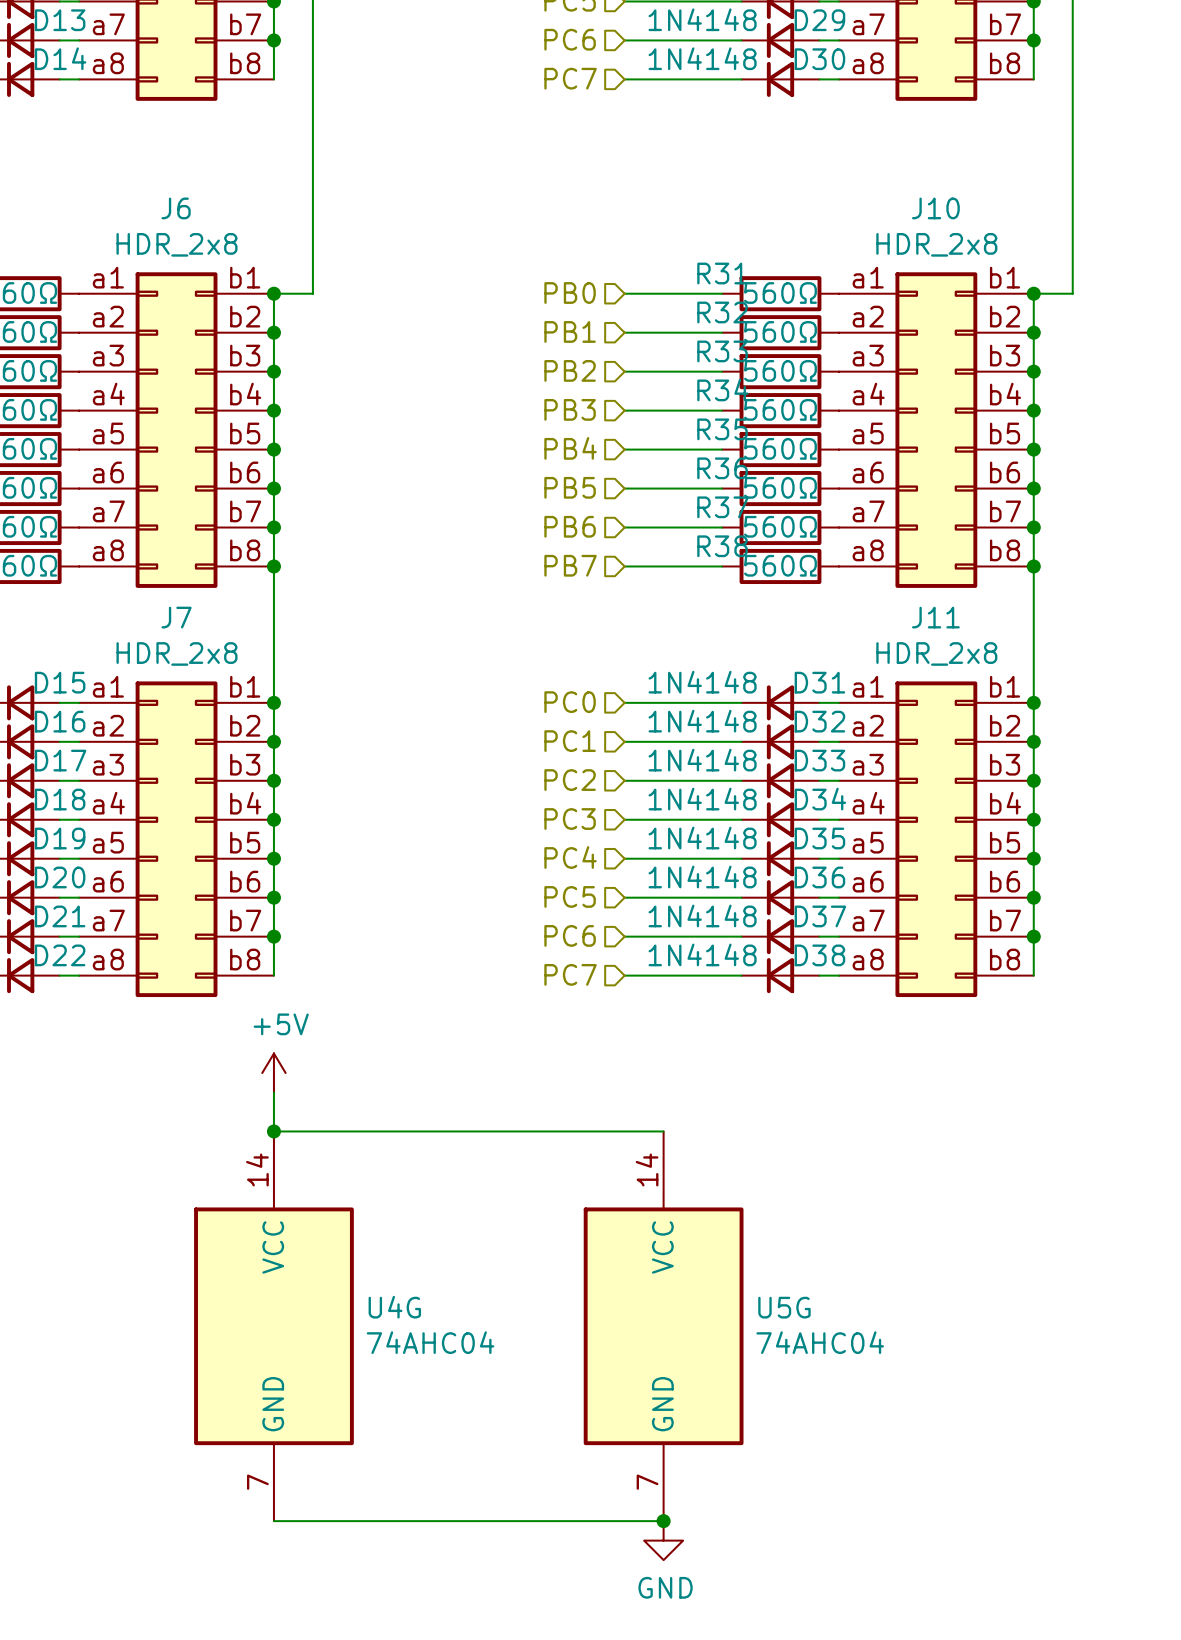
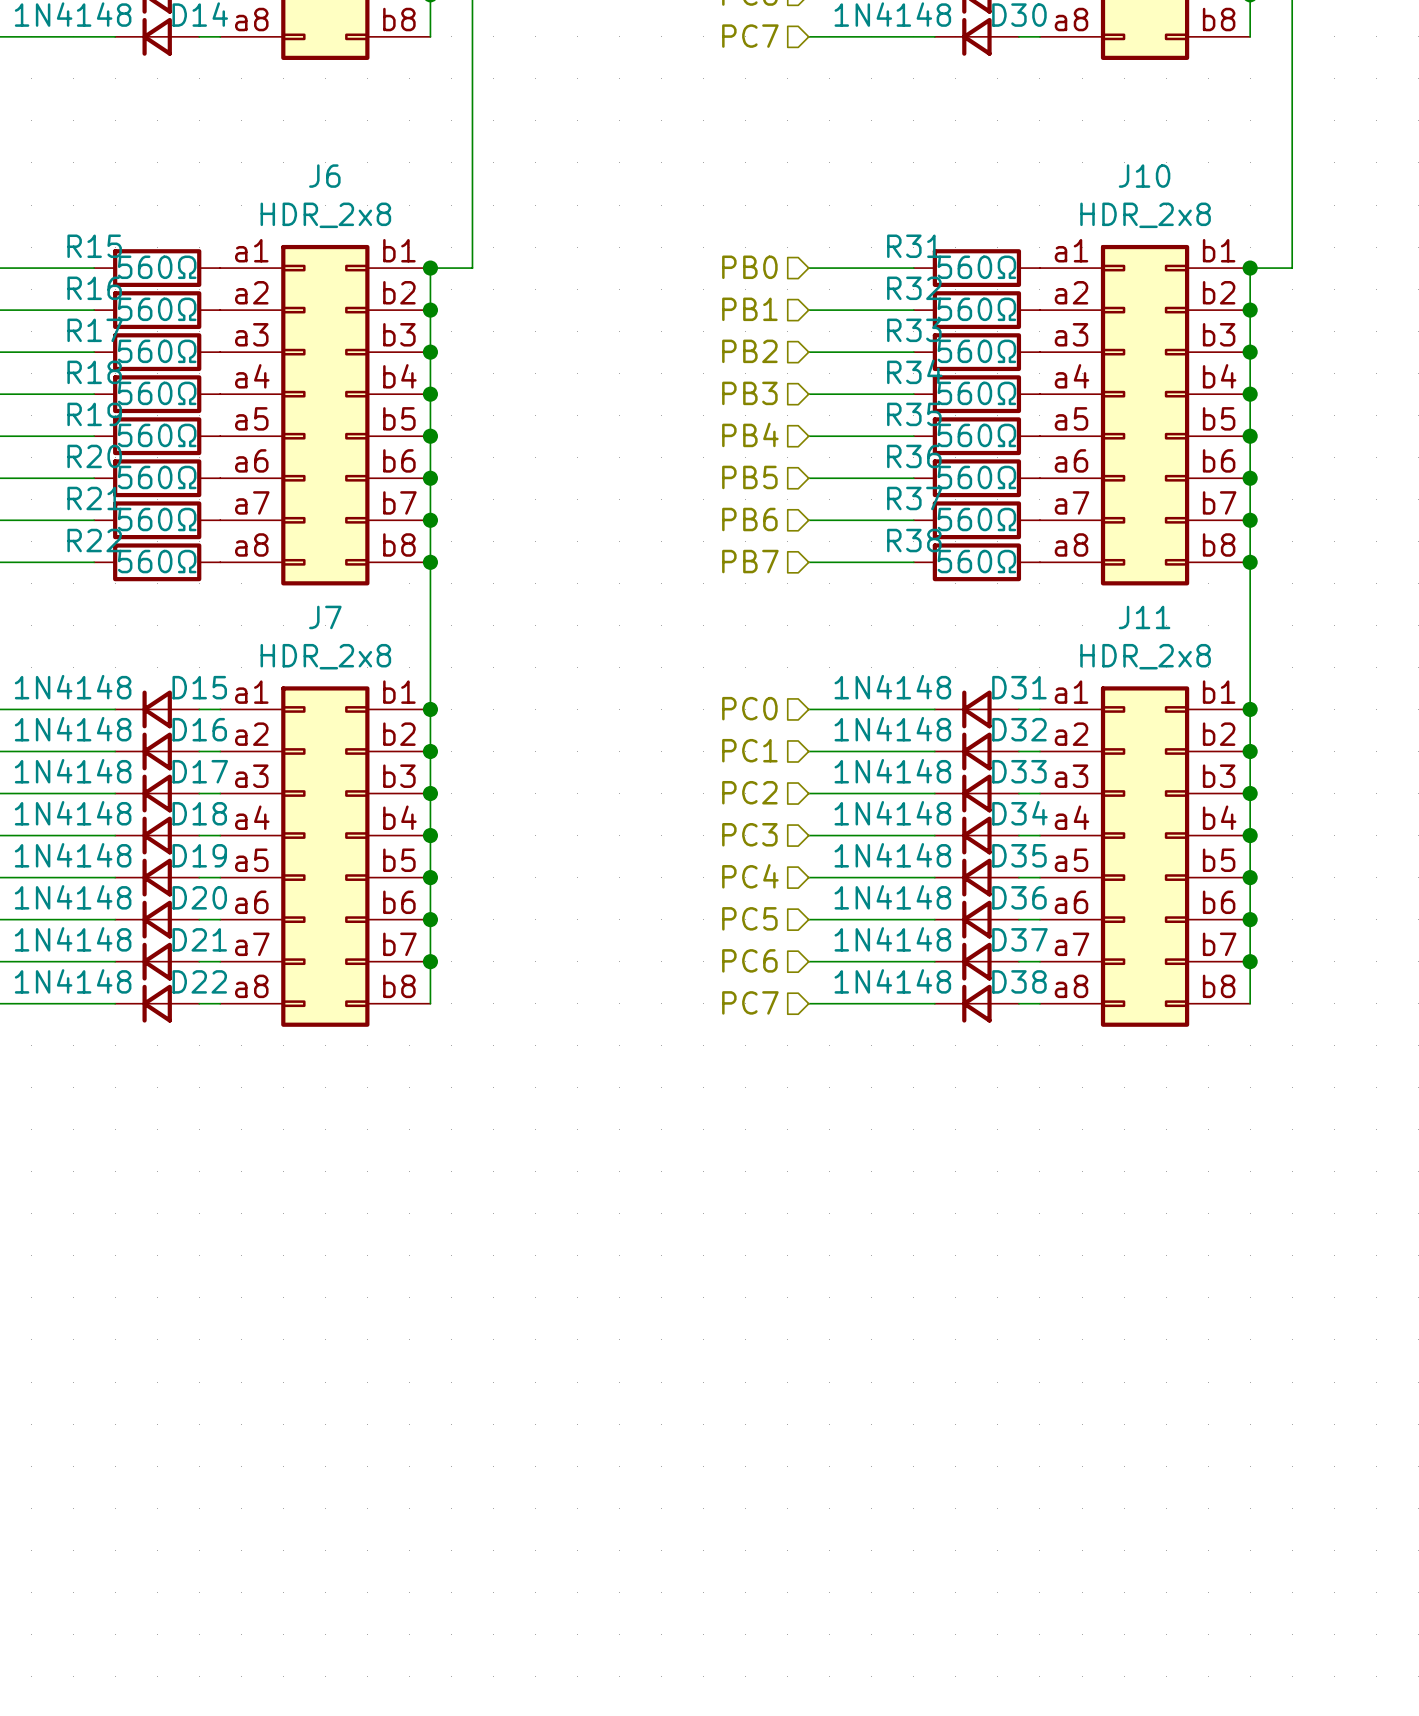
power symbol: +5V (273, 1073) -> none
wire: (273, 1092) (273, 1131) (663, 1131) -> none
junction: (273, 1131) -> none
U4G: 74AHC04 (273, 1326) -> none
U5G: 74AHC04 (663, 1326) -> none
wire: (273, 1521) (663, 1521) -> none
junction: (663, 1521) -> none
power symbol: GND (663, 1540) -> none

